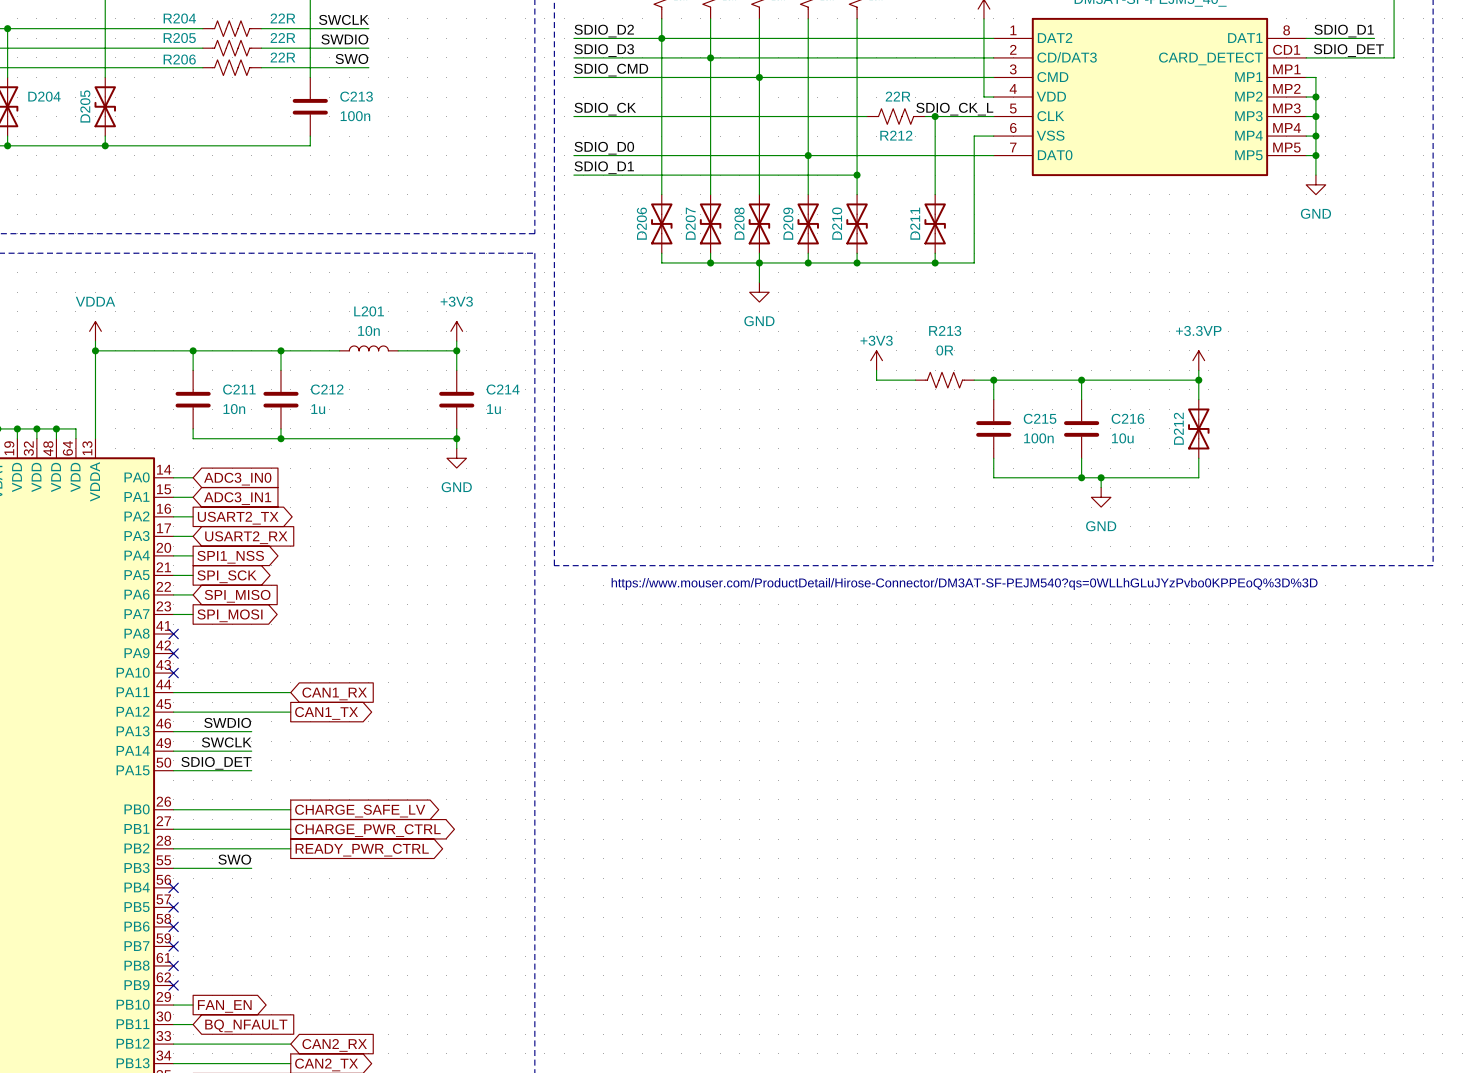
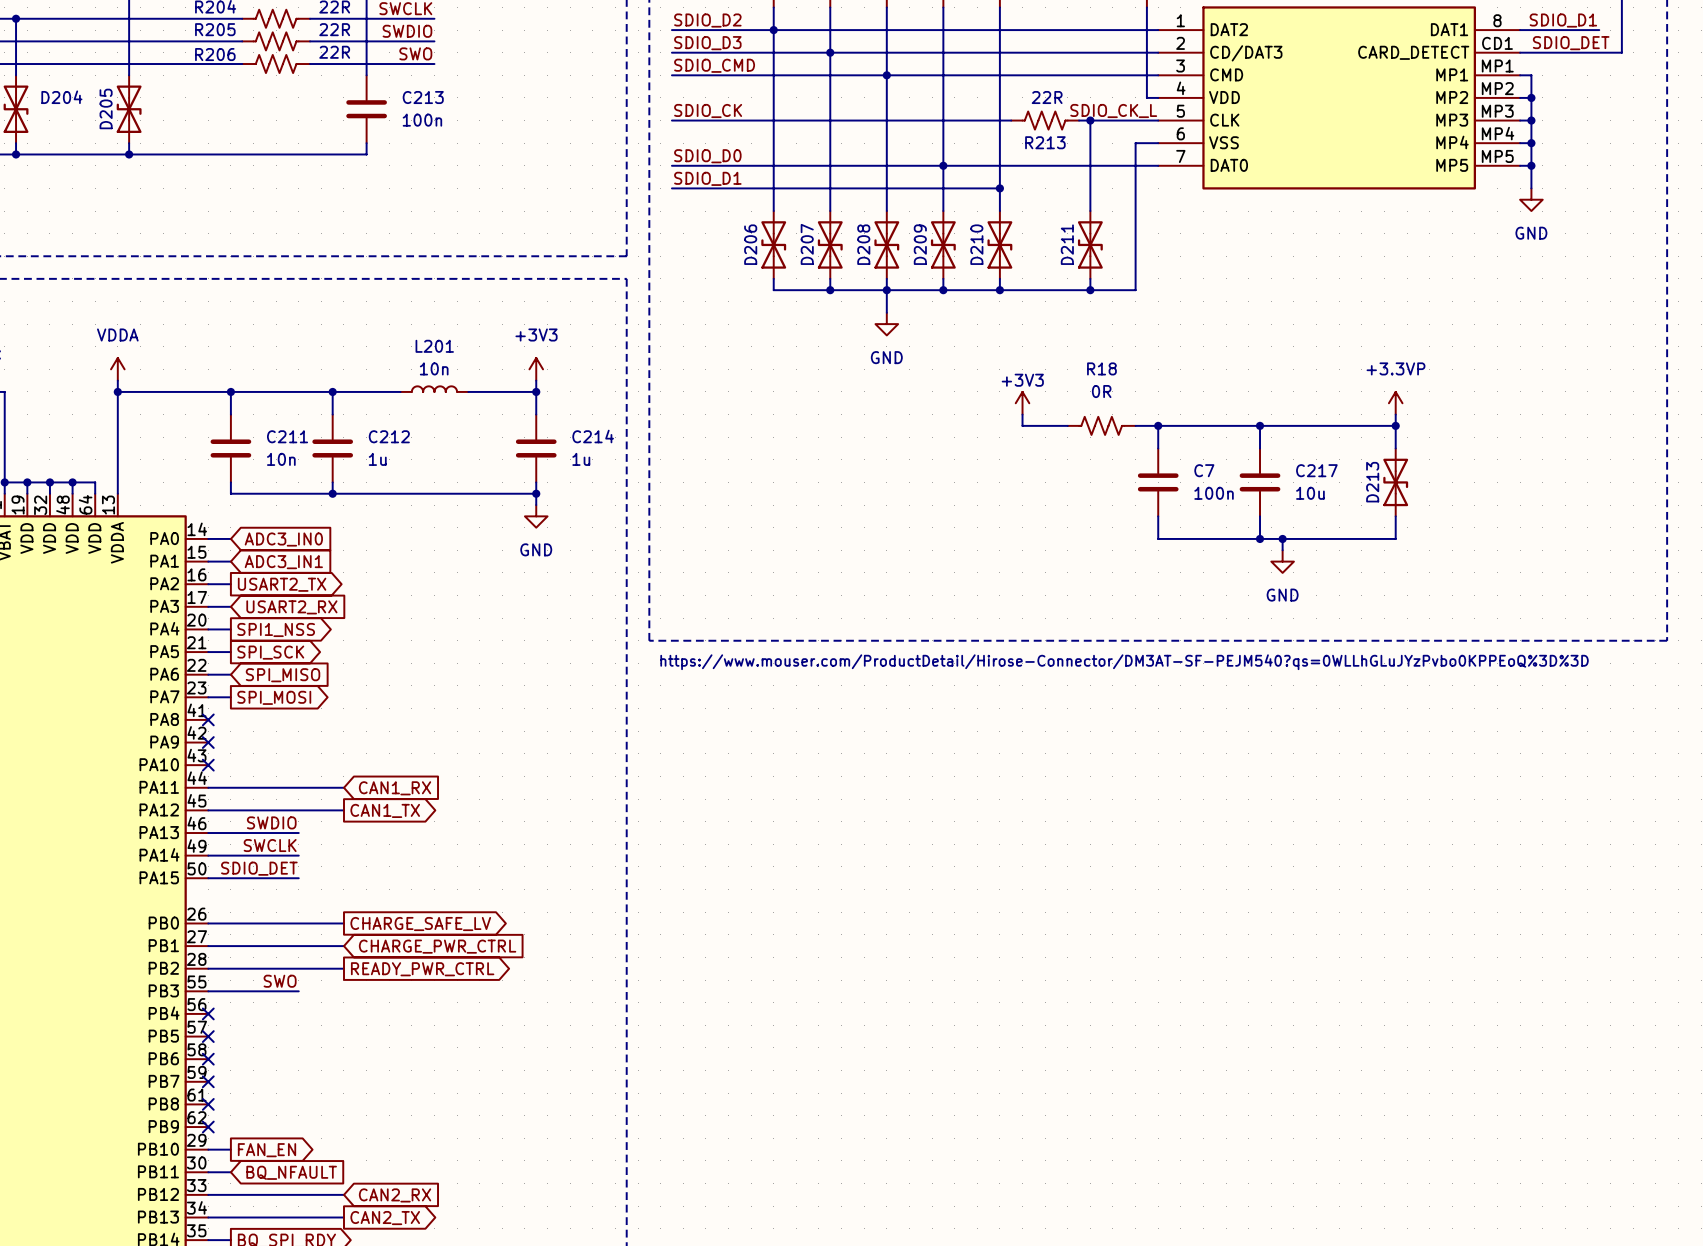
R212 name: R212 (896, 135) -> R213 (1045, 142)
R213 name: R213 (945, 330) -> R18 (1101, 368)
C215 name: C215 (1040, 418) -> C7 (1204, 470)
C216 name: C216 (1127, 418) -> C217 (1316, 470)
D212 name: D212 (1178, 428) -> D213 (1372, 482)
global label shape: output (367, 830) -> input (437, 946)

